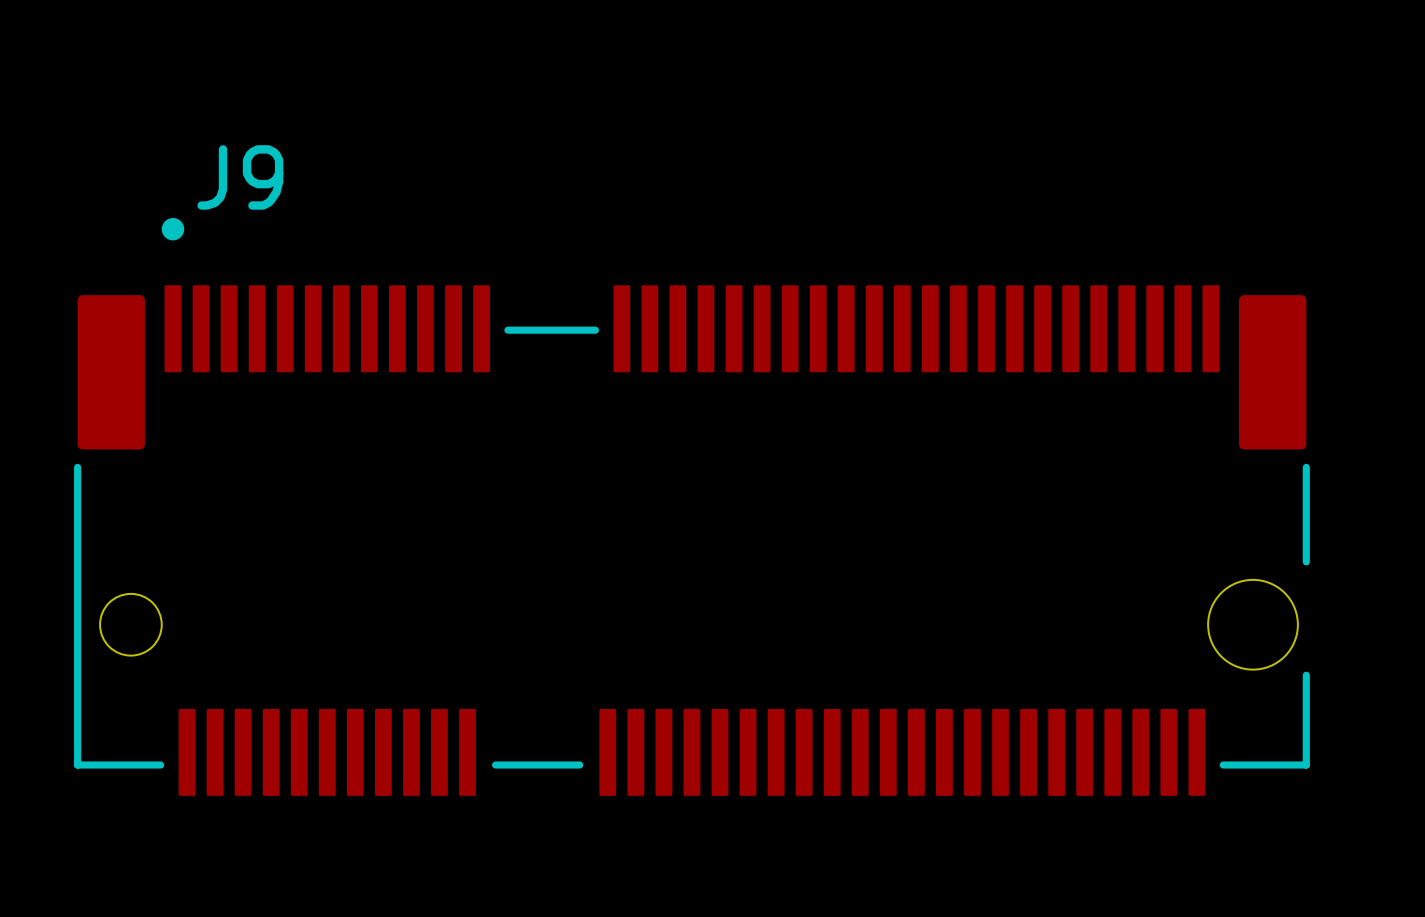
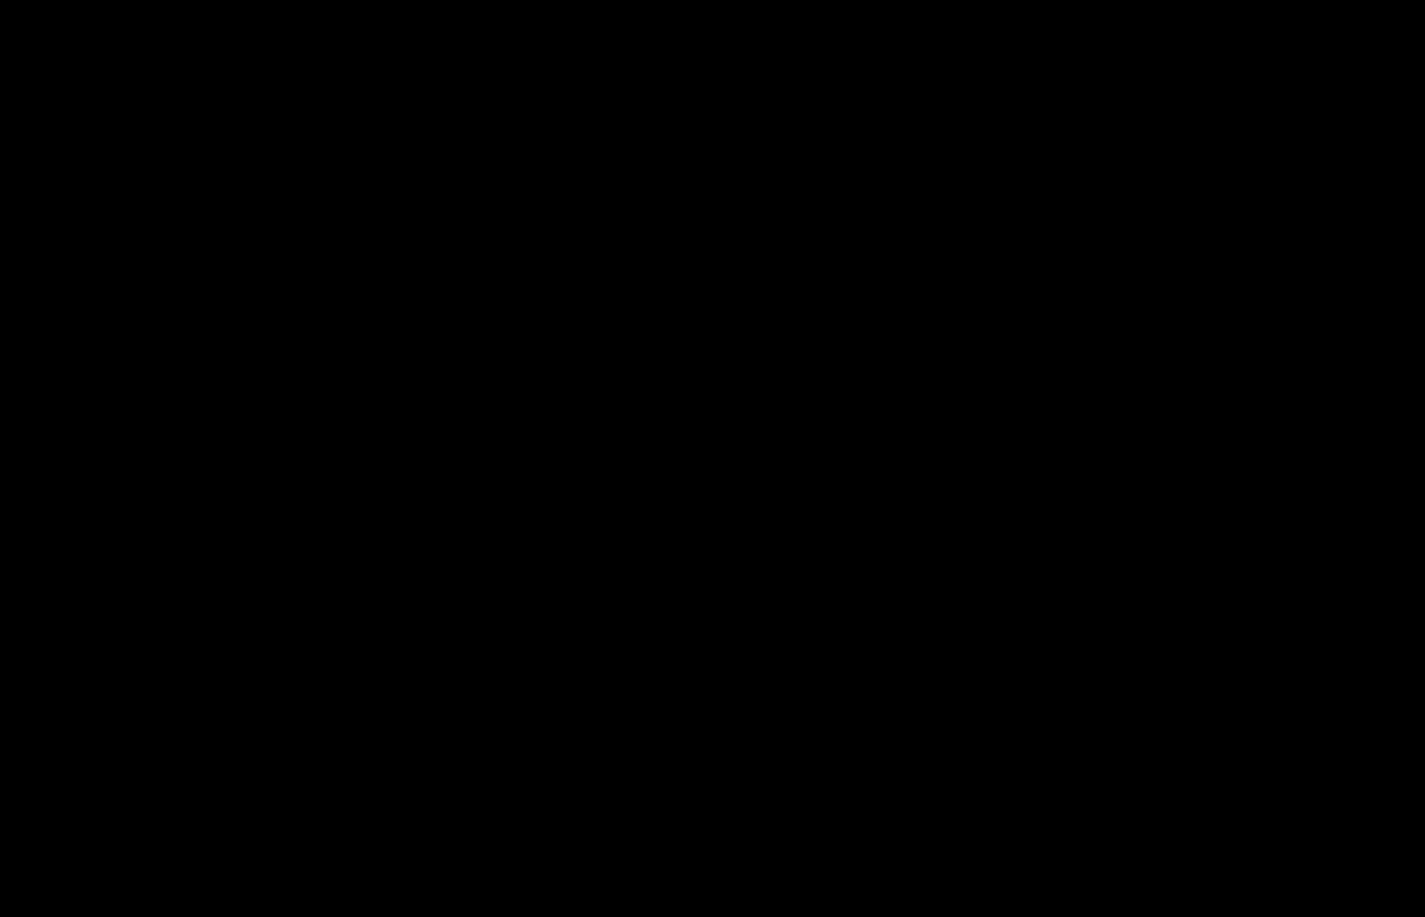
J9: (691, 506) -> none

